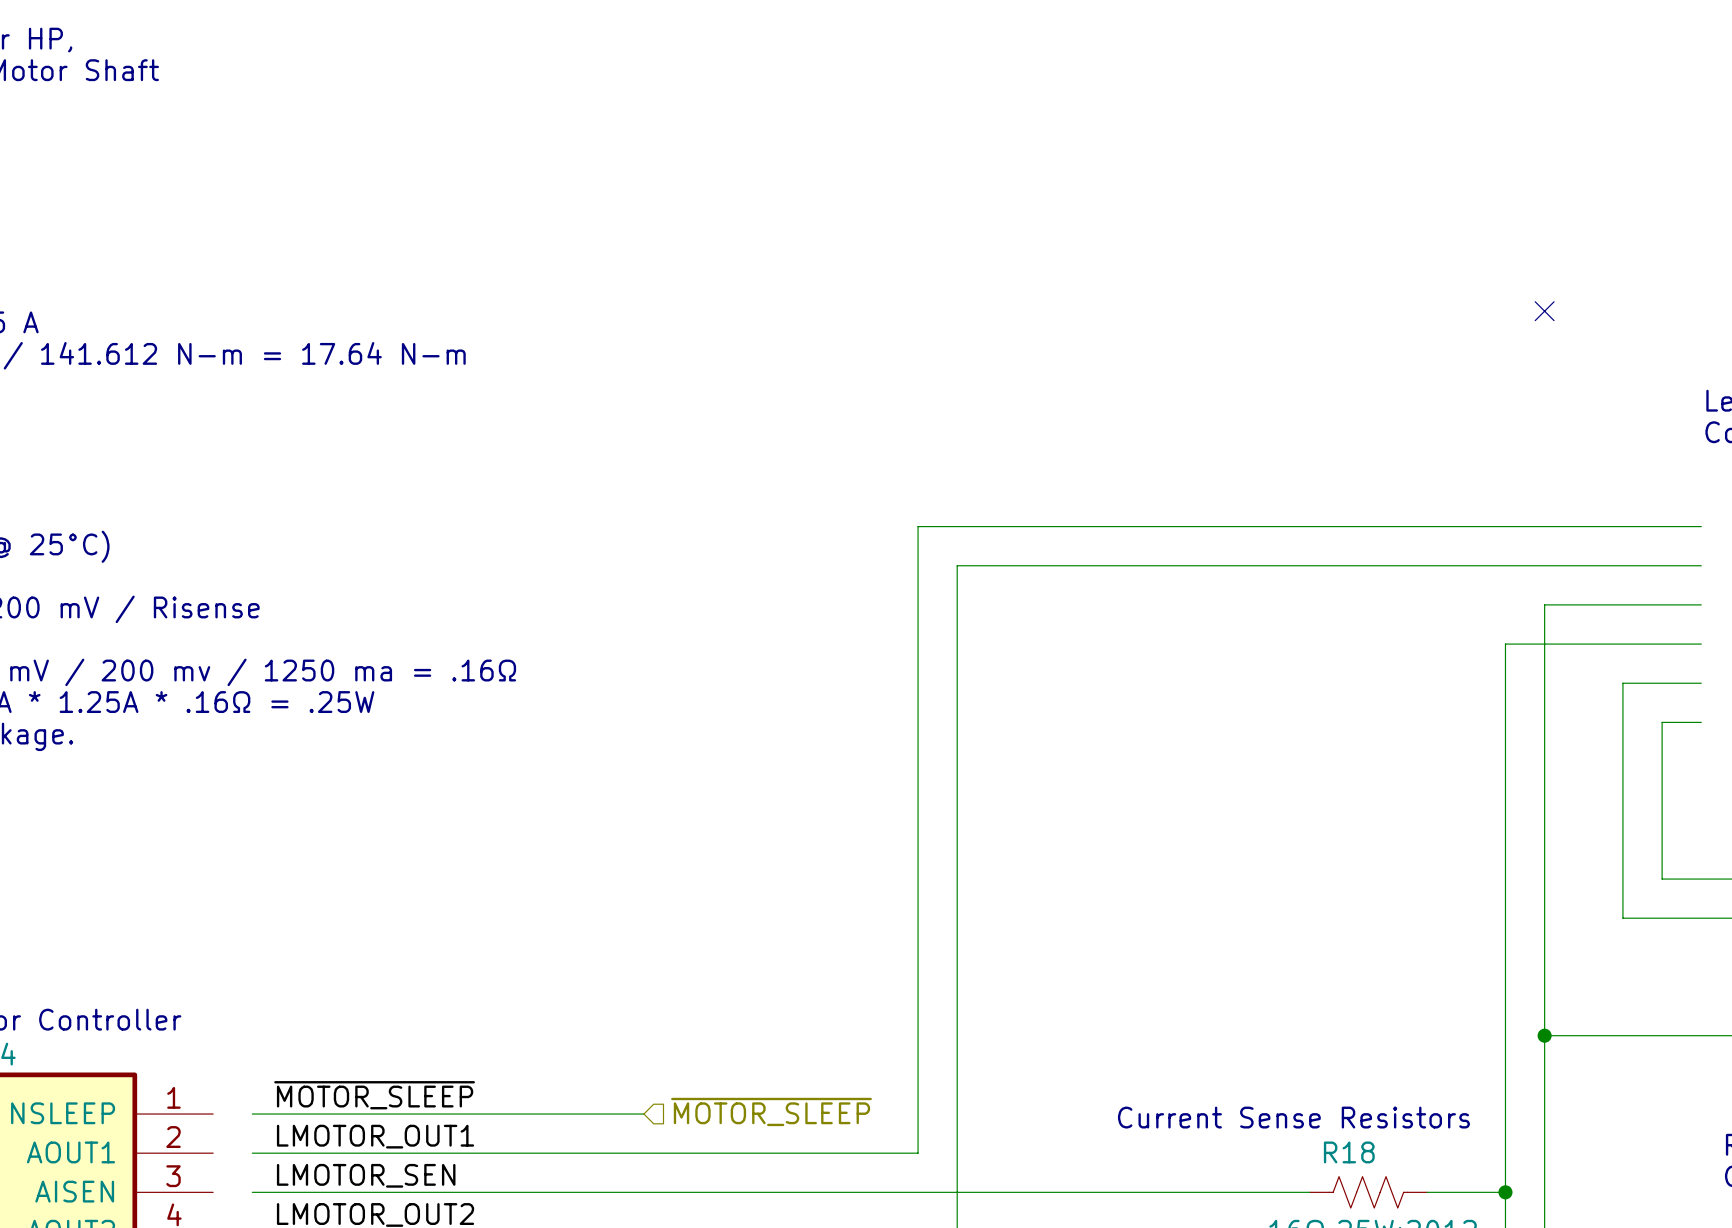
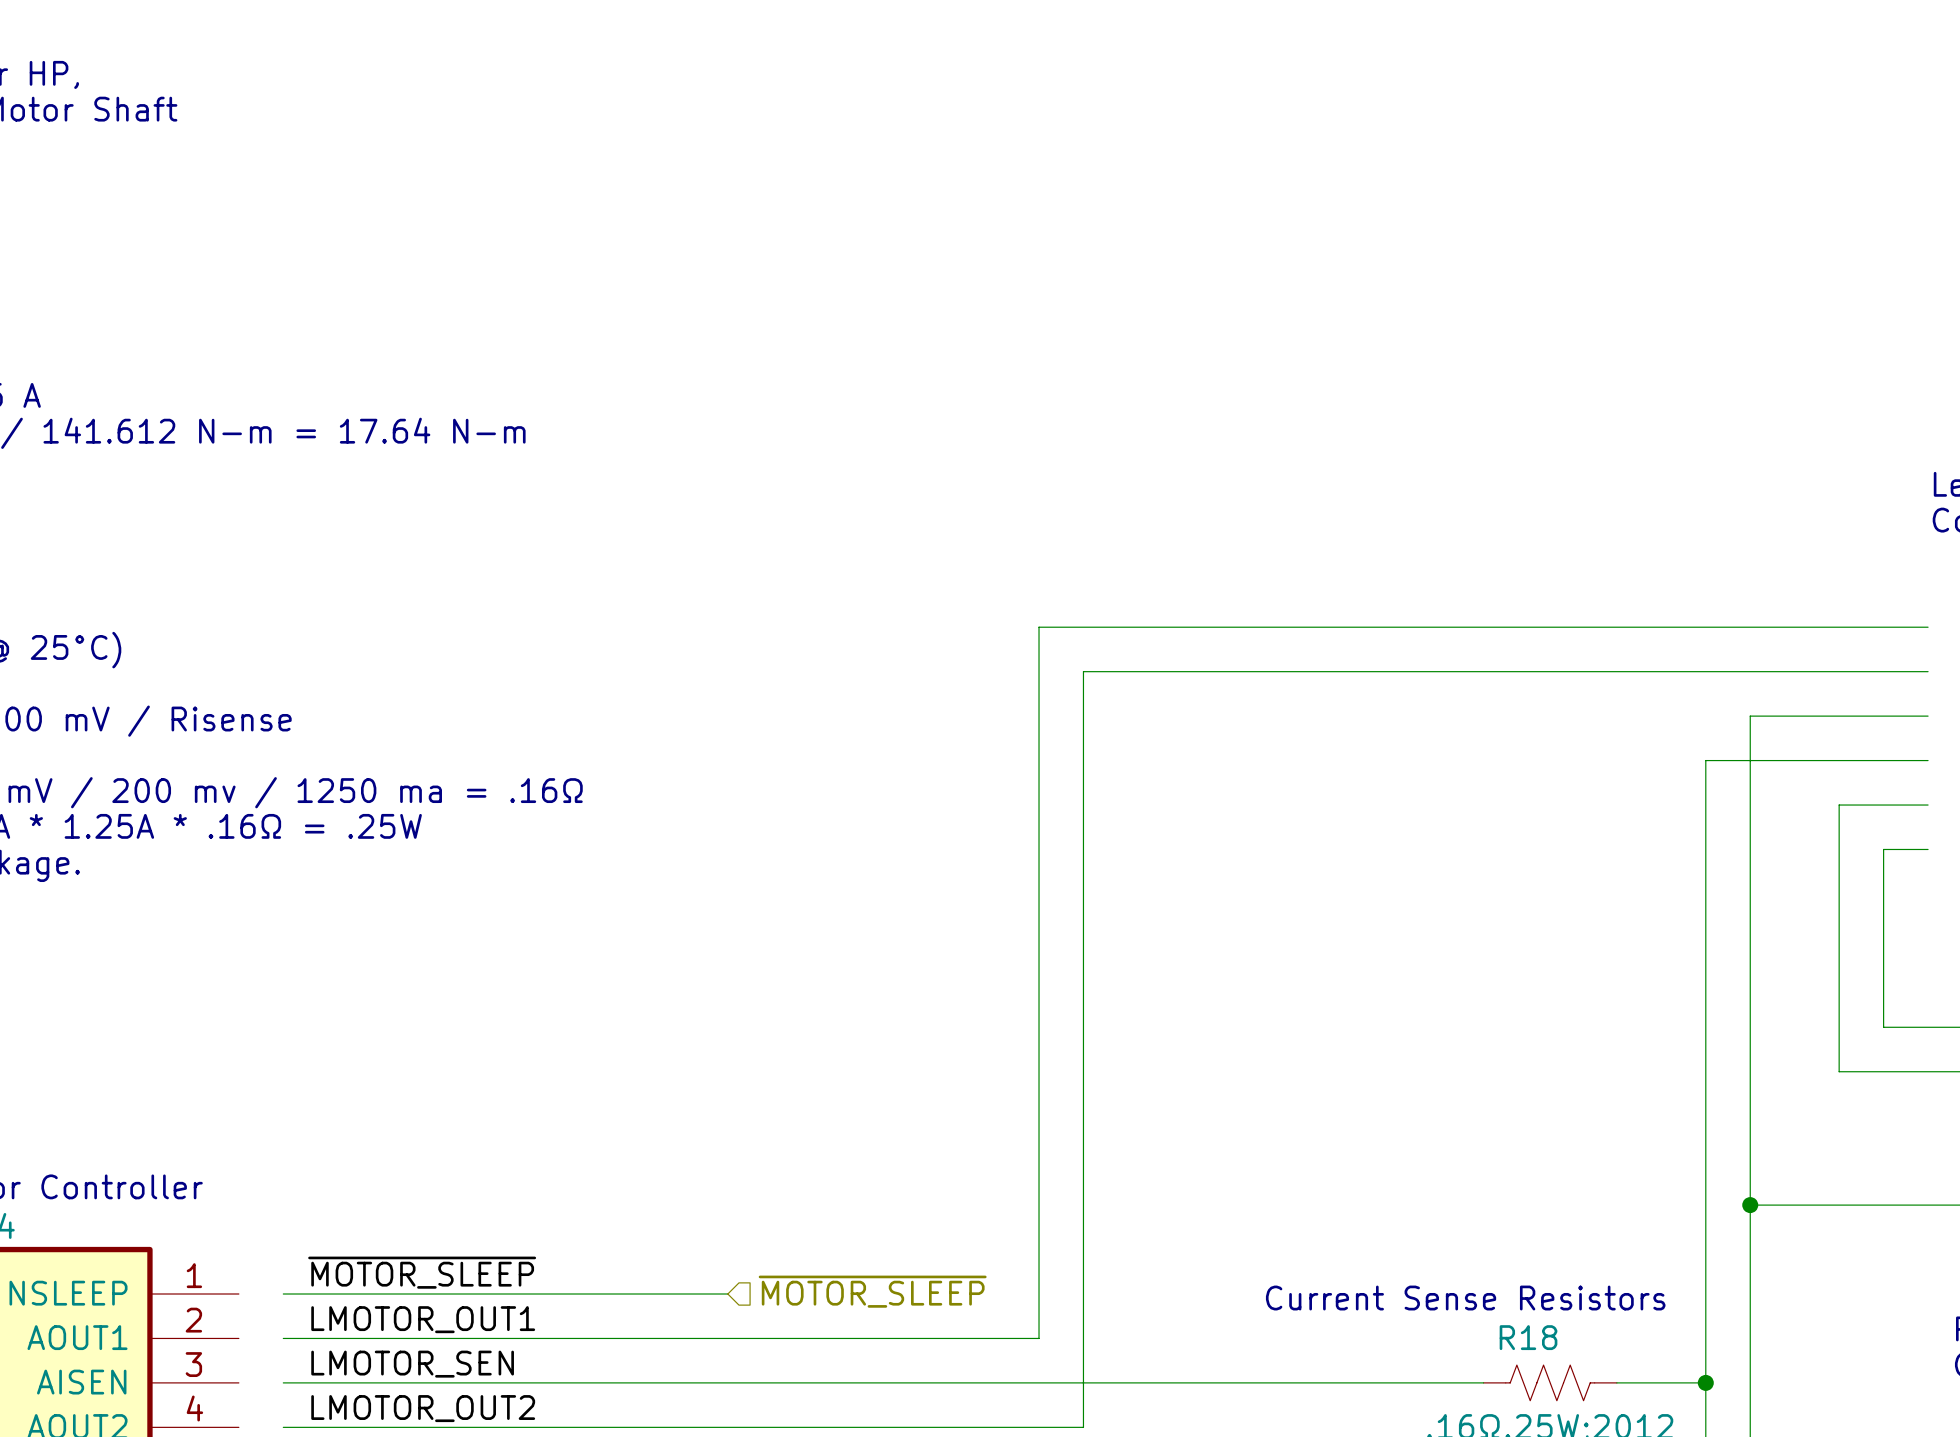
no-connect mark: (1544, 311) -> none

